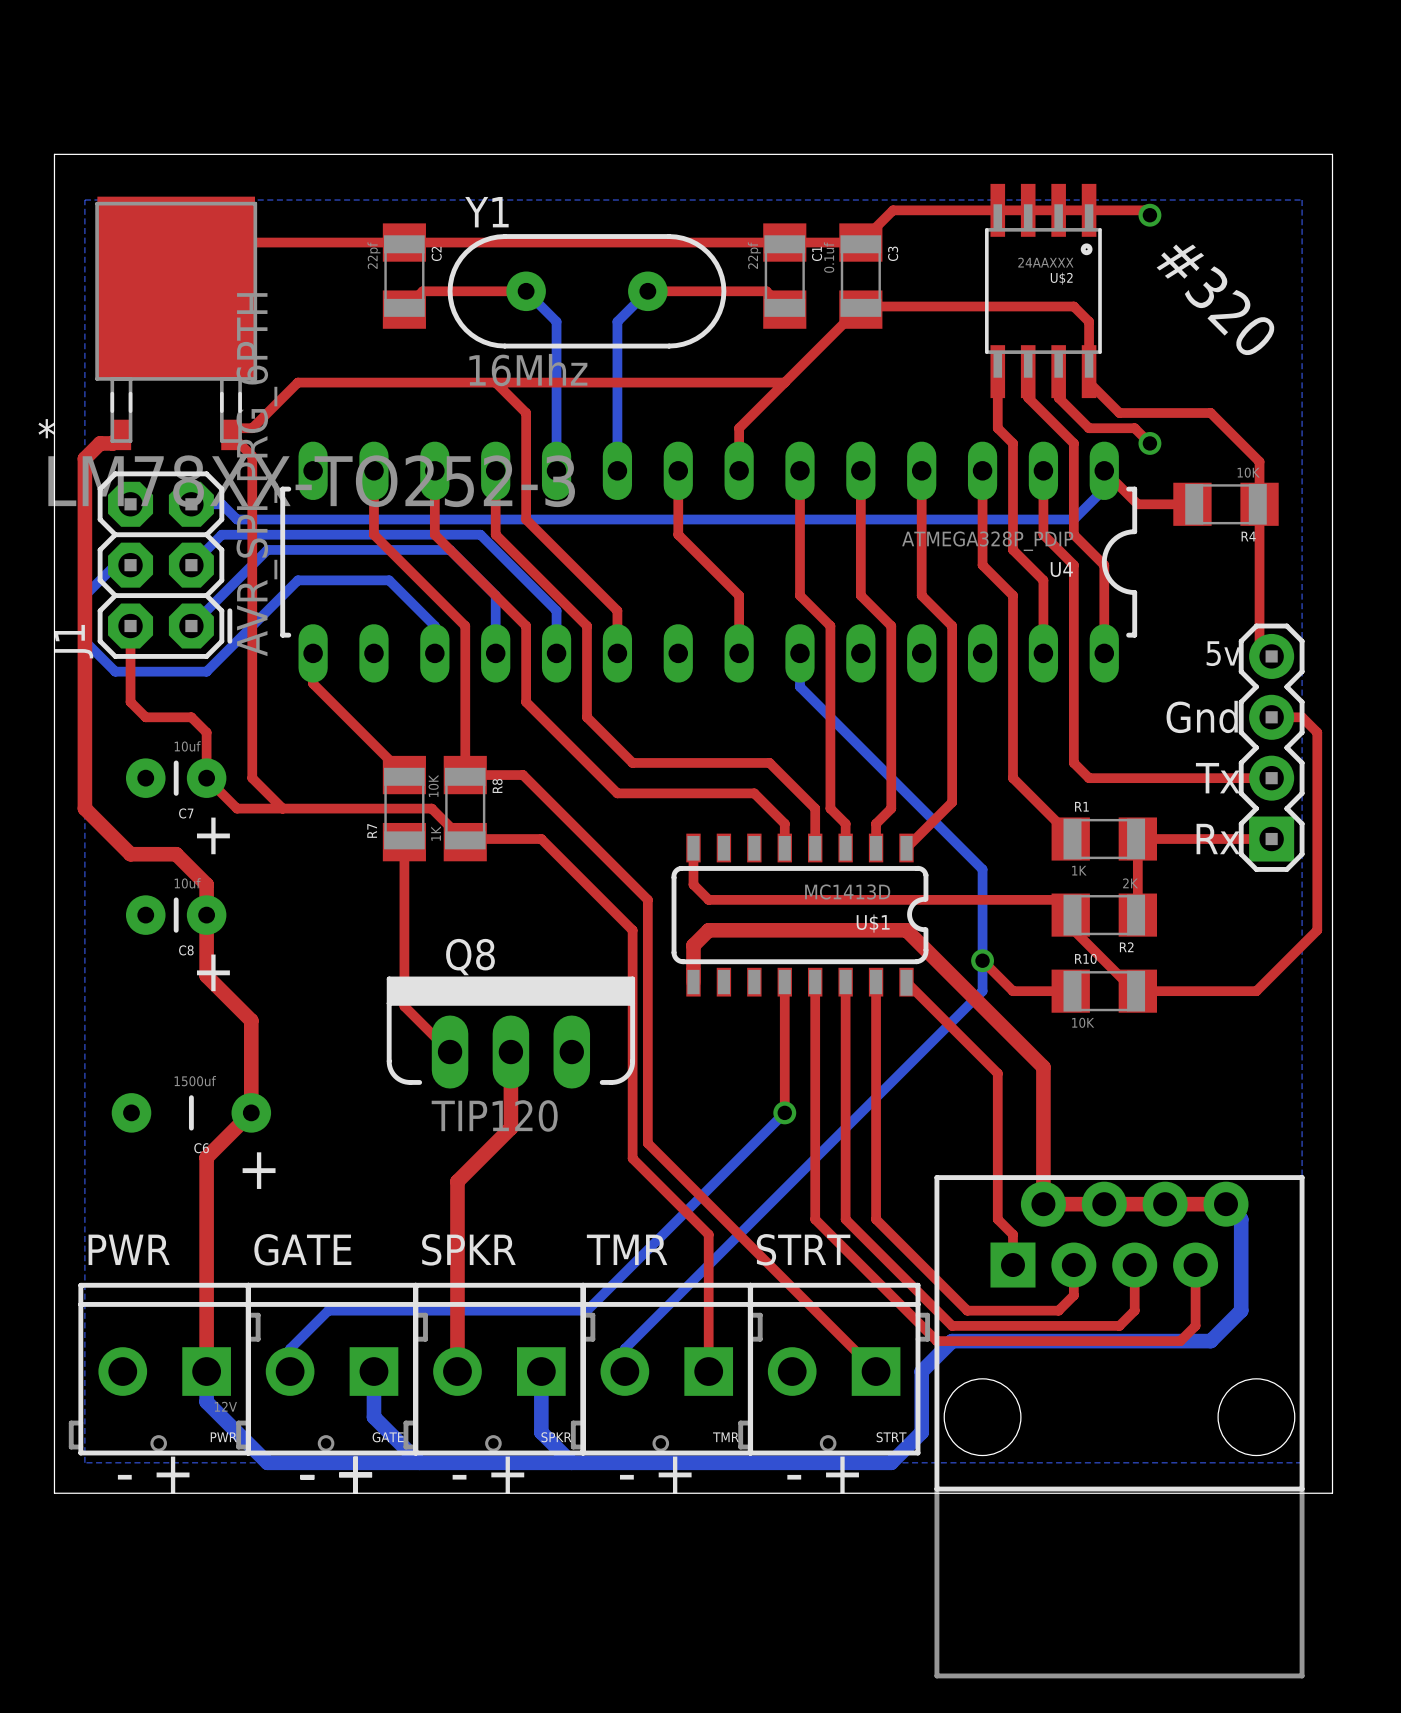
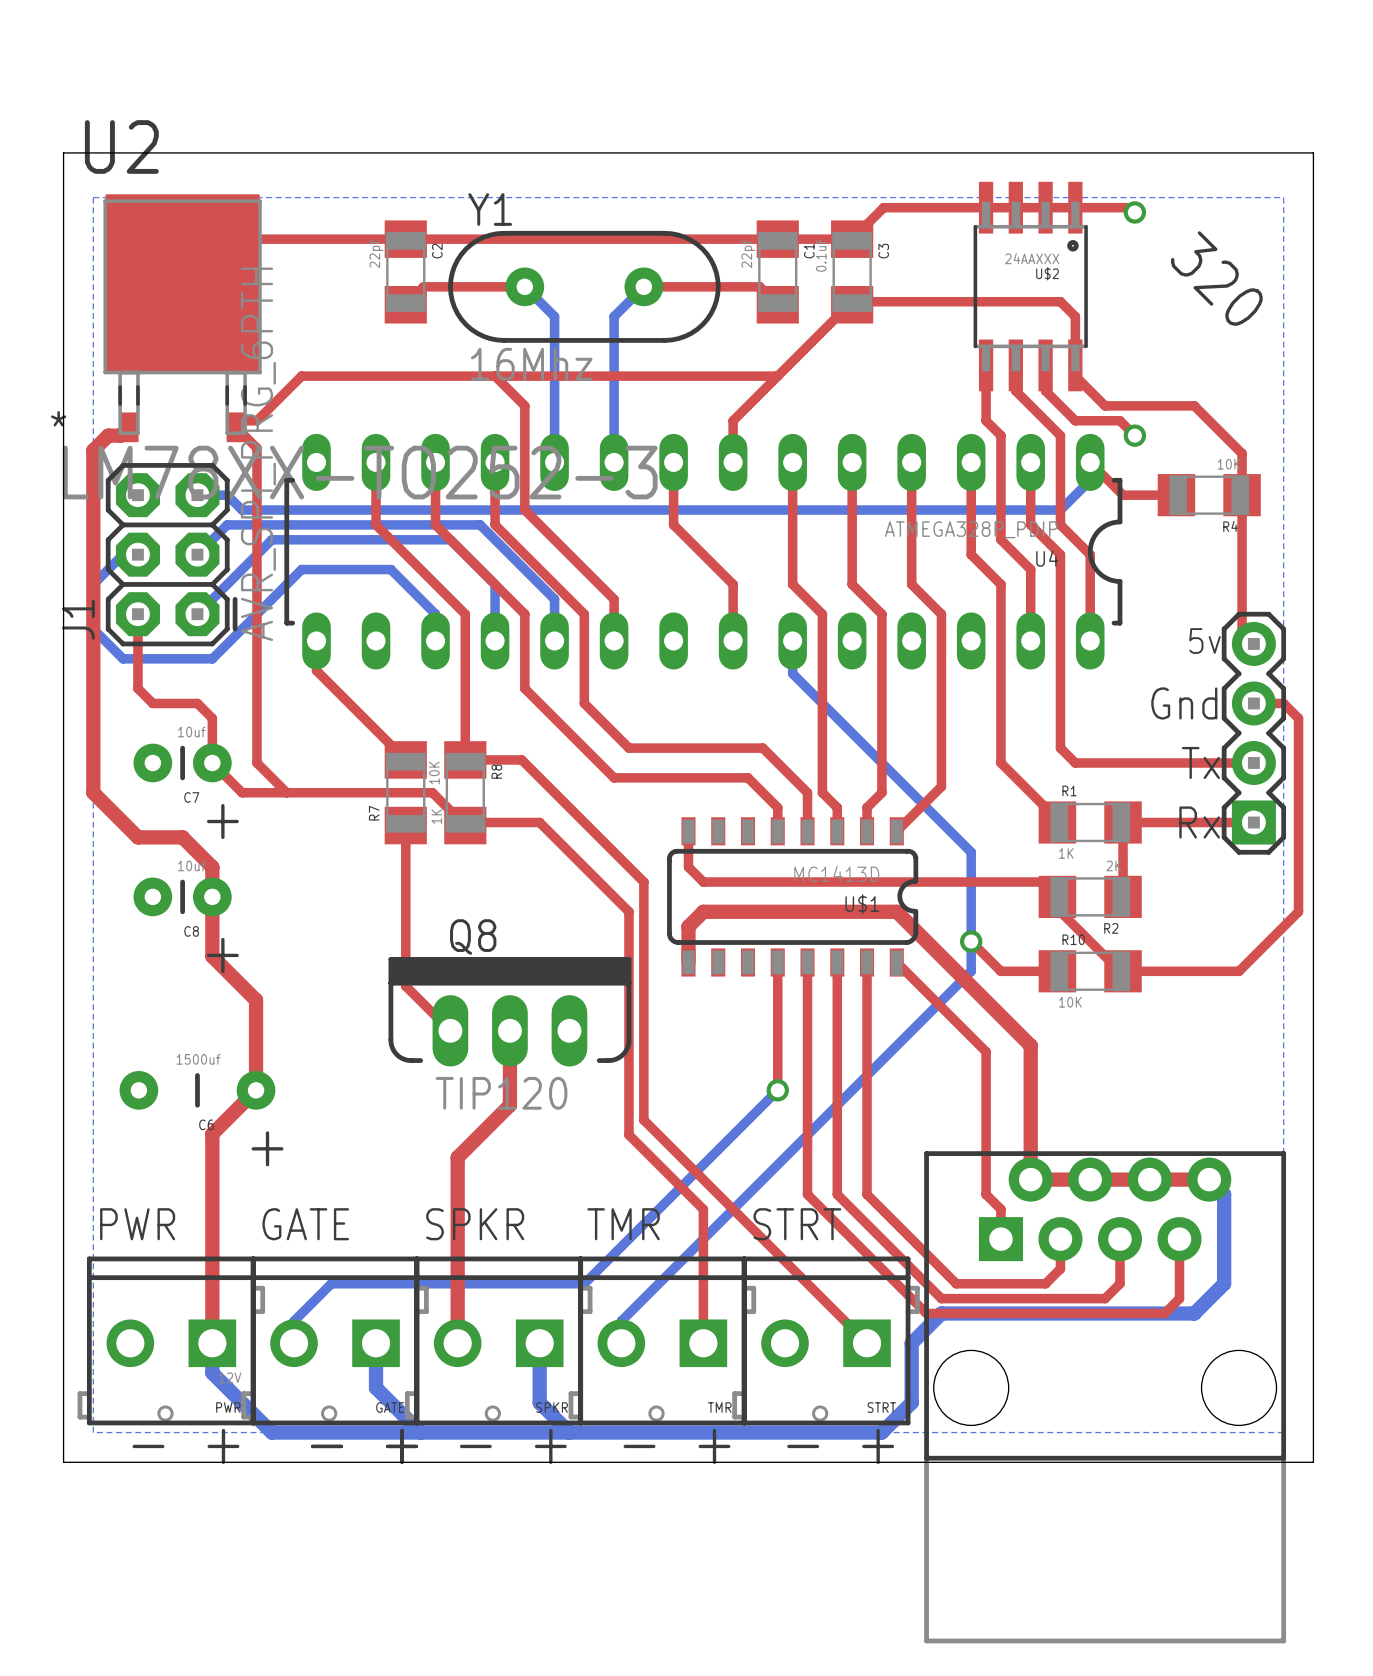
U2 name: none -> U2 (121, 146)
text: #320 (1216, 300) -> 320 (1216, 278)

